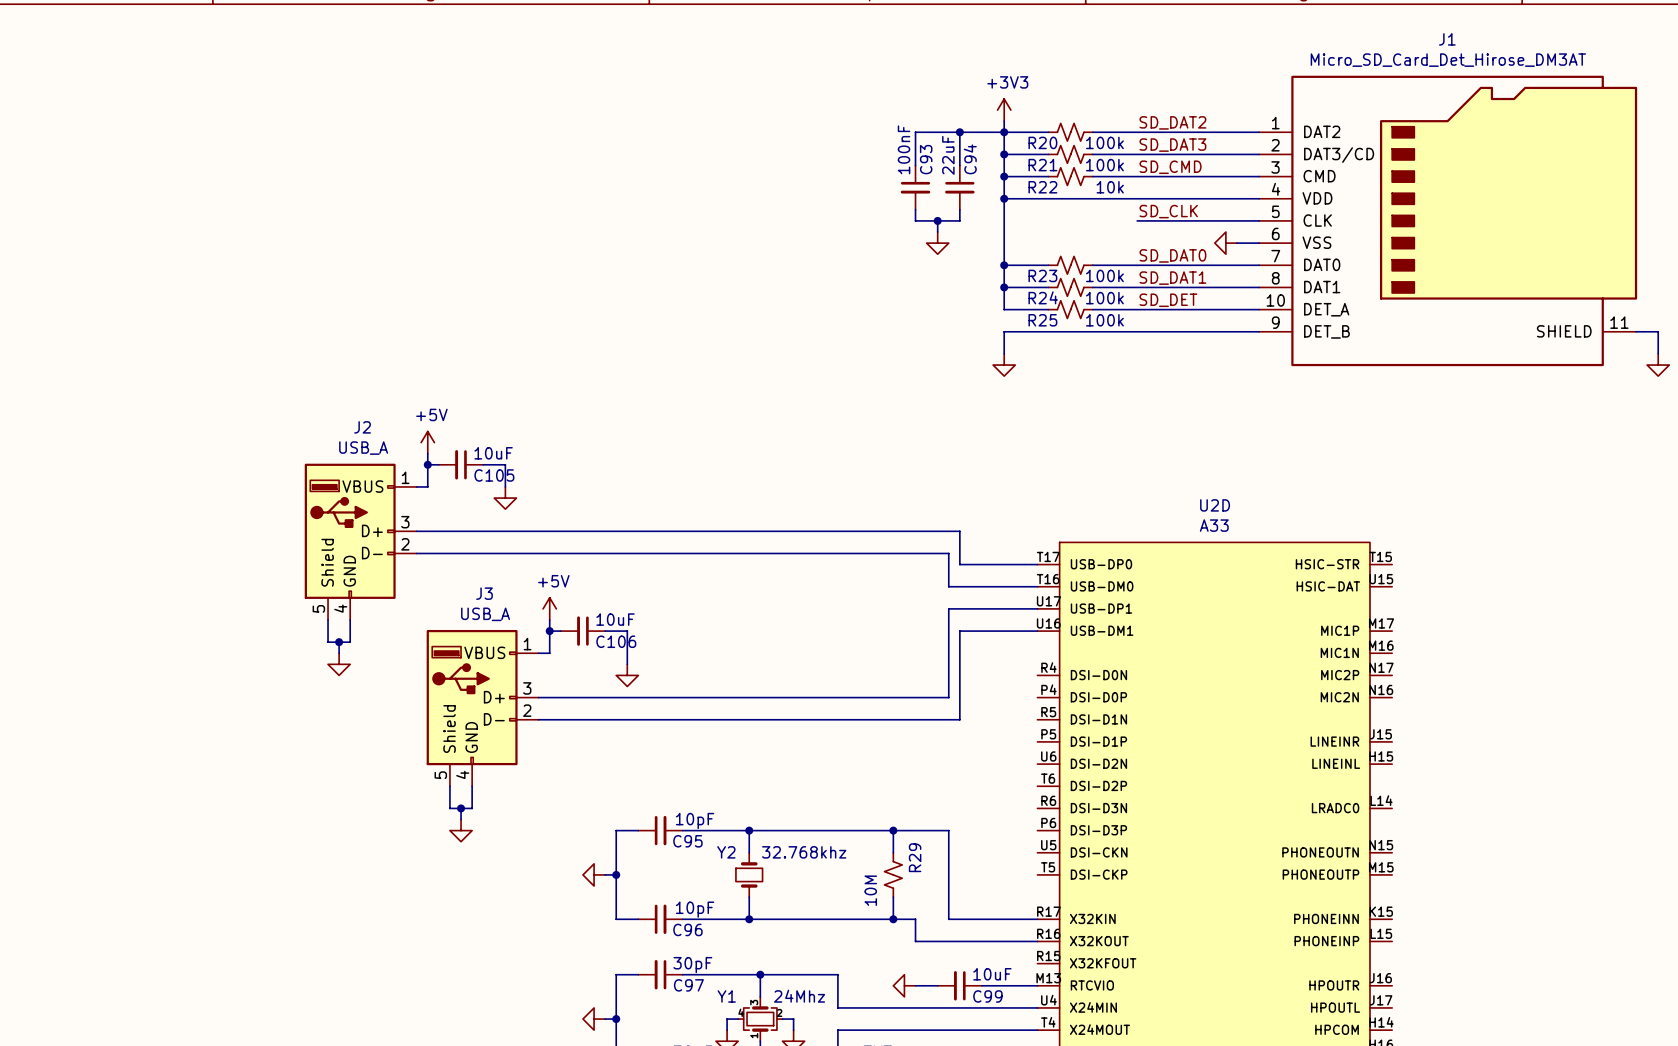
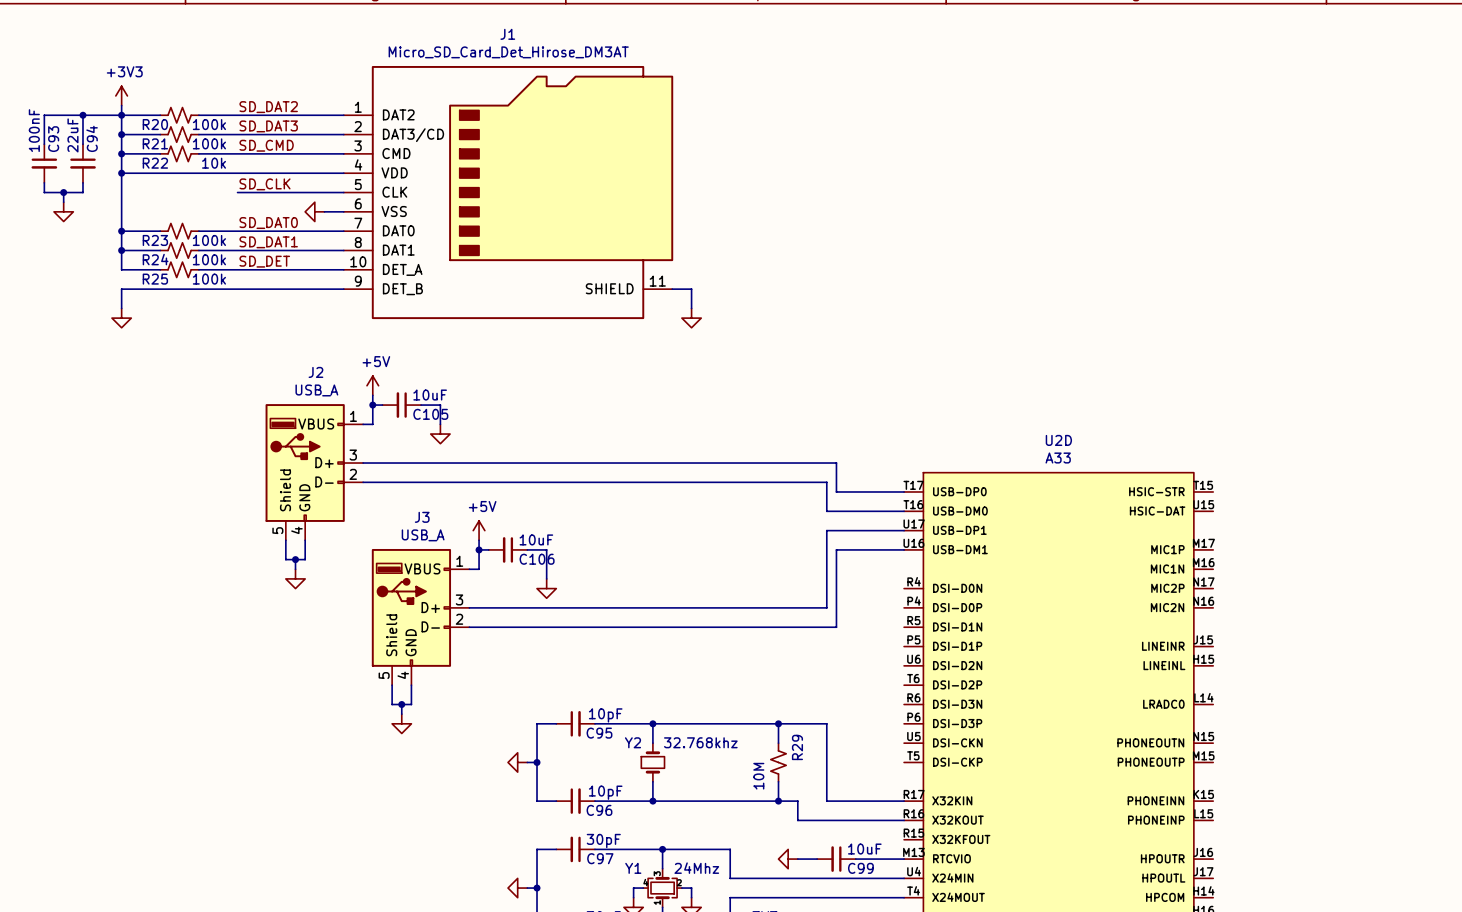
power symbol: none -> +3V3 (121, 95)
power symbol: +3V3 (1004, 110) -> none
wire: none -> (121, 105) (121, 269) (160, 269)
wire: (1004, 121) (1004, 309) (1048, 309) -> none
label: none -> SD_DAT2 (268, 107)
label: SD_DAT2 (1172, 122) -> none
wire: none -> (82, 115) (82, 144)
junction: none -> (82, 115)
junction: none -> (121, 115)
wire: none -> (160, 115) (44, 115) (44, 144)
wire: none -> (198, 115) (343, 115)
wire: (959, 132) (959, 165) -> none
junction: (959, 132) -> none
junction: (1004, 132) -> none
wire: (1048, 132) (915, 132) (915, 165) -> none
R20 position: (1070, 132) -> (179, 115)
wire: (1092, 132) (1259, 132) -> none
label: none -> SD_DAT3 (268, 126)
label: SD_DAT3 (1172, 145) -> none
wire: none -> (121, 134) (160, 134)
junction: none -> (121, 134)
wire: none -> (198, 134) (343, 134)
wire: (1004, 154) (1048, 154) -> none
junction: (1004, 154) -> none
R21 position: (1070, 154) -> (179, 134)
wire: (1092, 154) (1259, 154) -> none
label: none -> SD_CMD (266, 145)
label: SD_CMD (1170, 167) -> none
wire: none -> (121, 153) (160, 153)
junction: none -> (121, 153)
wire: none -> (198, 153) (343, 153)
wire: (1004, 176) (1048, 176) -> none
junction: (1004, 176) -> none
R22 position: (1070, 176) -> (179, 153)
wire: (1092, 176) (1259, 176) -> none
C93 position: (915, 187) -> (44, 163)
C94 position: (959, 187) -> (82, 163)
wire: none -> (121, 173) (343, 173)
junction: none -> (121, 173)
wire: (1004, 198) (1259, 198) -> none
junction: (1004, 198) -> none
wire: none -> (44, 182) (44, 192) (82, 192) (82, 182)
wire: (915, 209) (915, 220) (959, 220) (959, 209) -> none
label: none -> SD_CLK (264, 184)
label: SD_CLK (1168, 211) -> none
wire: none -> (63, 192) (63, 202)
junction: none -> (63, 192)
wire: none -> (237, 192) (343, 192)
wire: (937, 220) (937, 232) -> none
junction: (937, 220) -> none
wire: (1137, 220) (1259, 220) -> none
J1 position: (1448, 220) -> (508, 192)
power symbol: none -> (63, 211)
power symbol: none -> (314, 211)
wire: none -> (324, 211) (343, 211)
power symbol: (937, 243) -> none
power symbol: (1225, 243) -> none
wire: (1236, 243) (1259, 243) -> none
label: none -> SD_DAT0 (268, 223)
label: SD_DAT0 (1172, 255) -> none
wire: none -> (121, 231) (160, 231)
junction: none -> (121, 231)
wire: none -> (198, 231) (343, 231)
wire: (1004, 265) (1048, 265) -> none
junction: (1004, 265) -> none
R23 position: (1070, 265) -> (179, 231)
wire: (1092, 265) (1259, 265) -> none
label: none -> SD_DAT1 (268, 242)
label: SD_DAT1 (1172, 278) -> none
wire: none -> (121, 250) (160, 250)
junction: none -> (121, 250)
wire: none -> (198, 250) (343, 250)
wire: (1004, 287) (1048, 287) -> none
junction: (1004, 287) -> none
R24 position: (1070, 287) -> (179, 250)
wire: (1092, 287) (1259, 287) -> none
label: none -> SD_DET (264, 261)
label: SD_DET (1168, 300) -> none
wire: none -> (198, 269) (343, 269)
R25 position: (1070, 309) -> (179, 269)
wire: (1092, 309) (1259, 309) -> none
wire: none -> (343, 289) (121, 289) (121, 308)
wire: none -> (672, 289) (691, 289) (691, 308)
wire: (1259, 331) (1004, 331) (1004, 353) -> none
wire: (1636, 331) (1658, 331) (1658, 353) -> none
power symbol: none -> (121, 318)
power symbol: none -> (691, 318)
power symbol: (1004, 365) -> none
power symbol: (1658, 365) -> none

